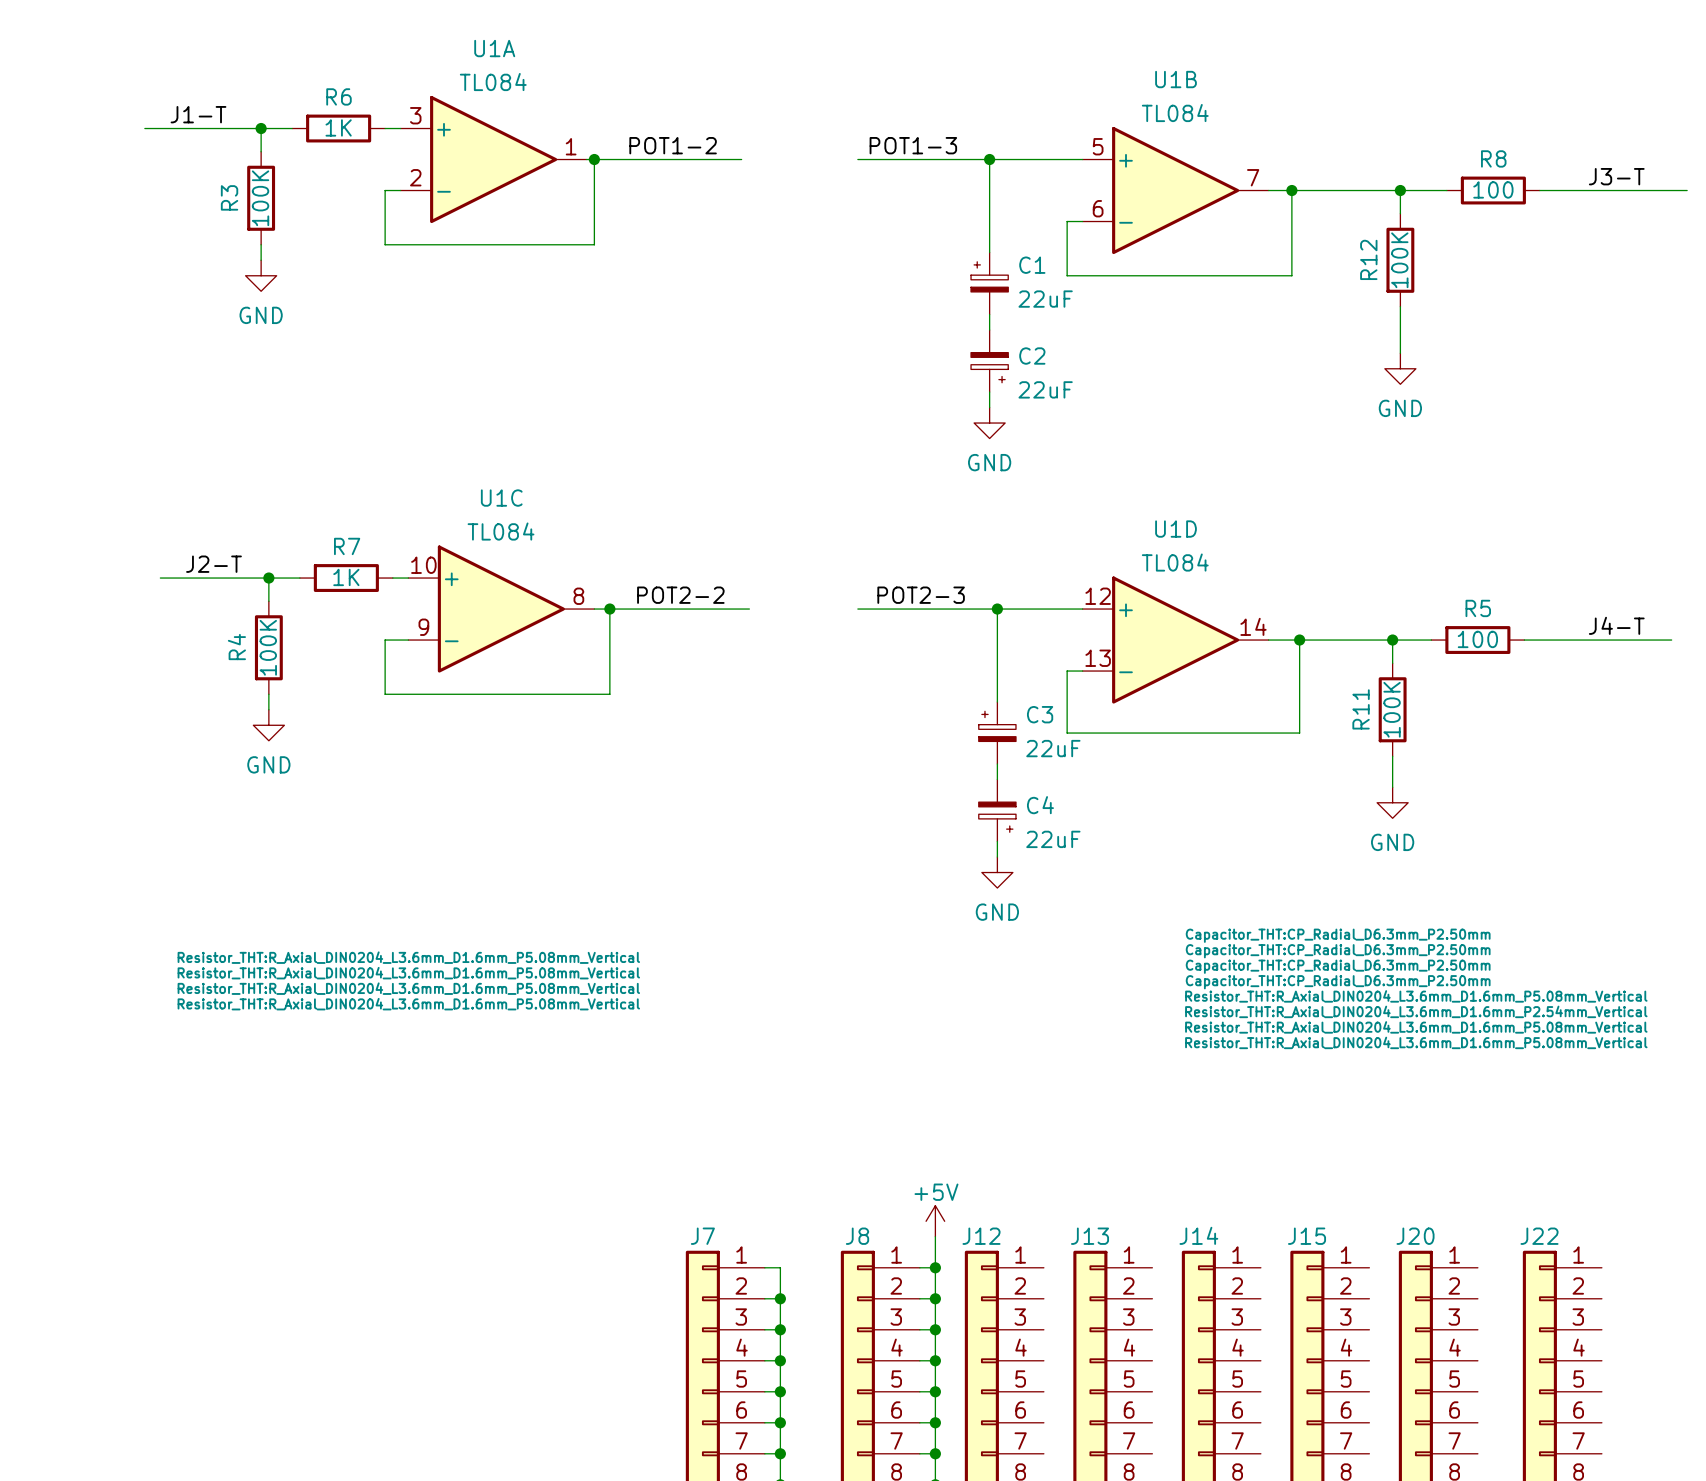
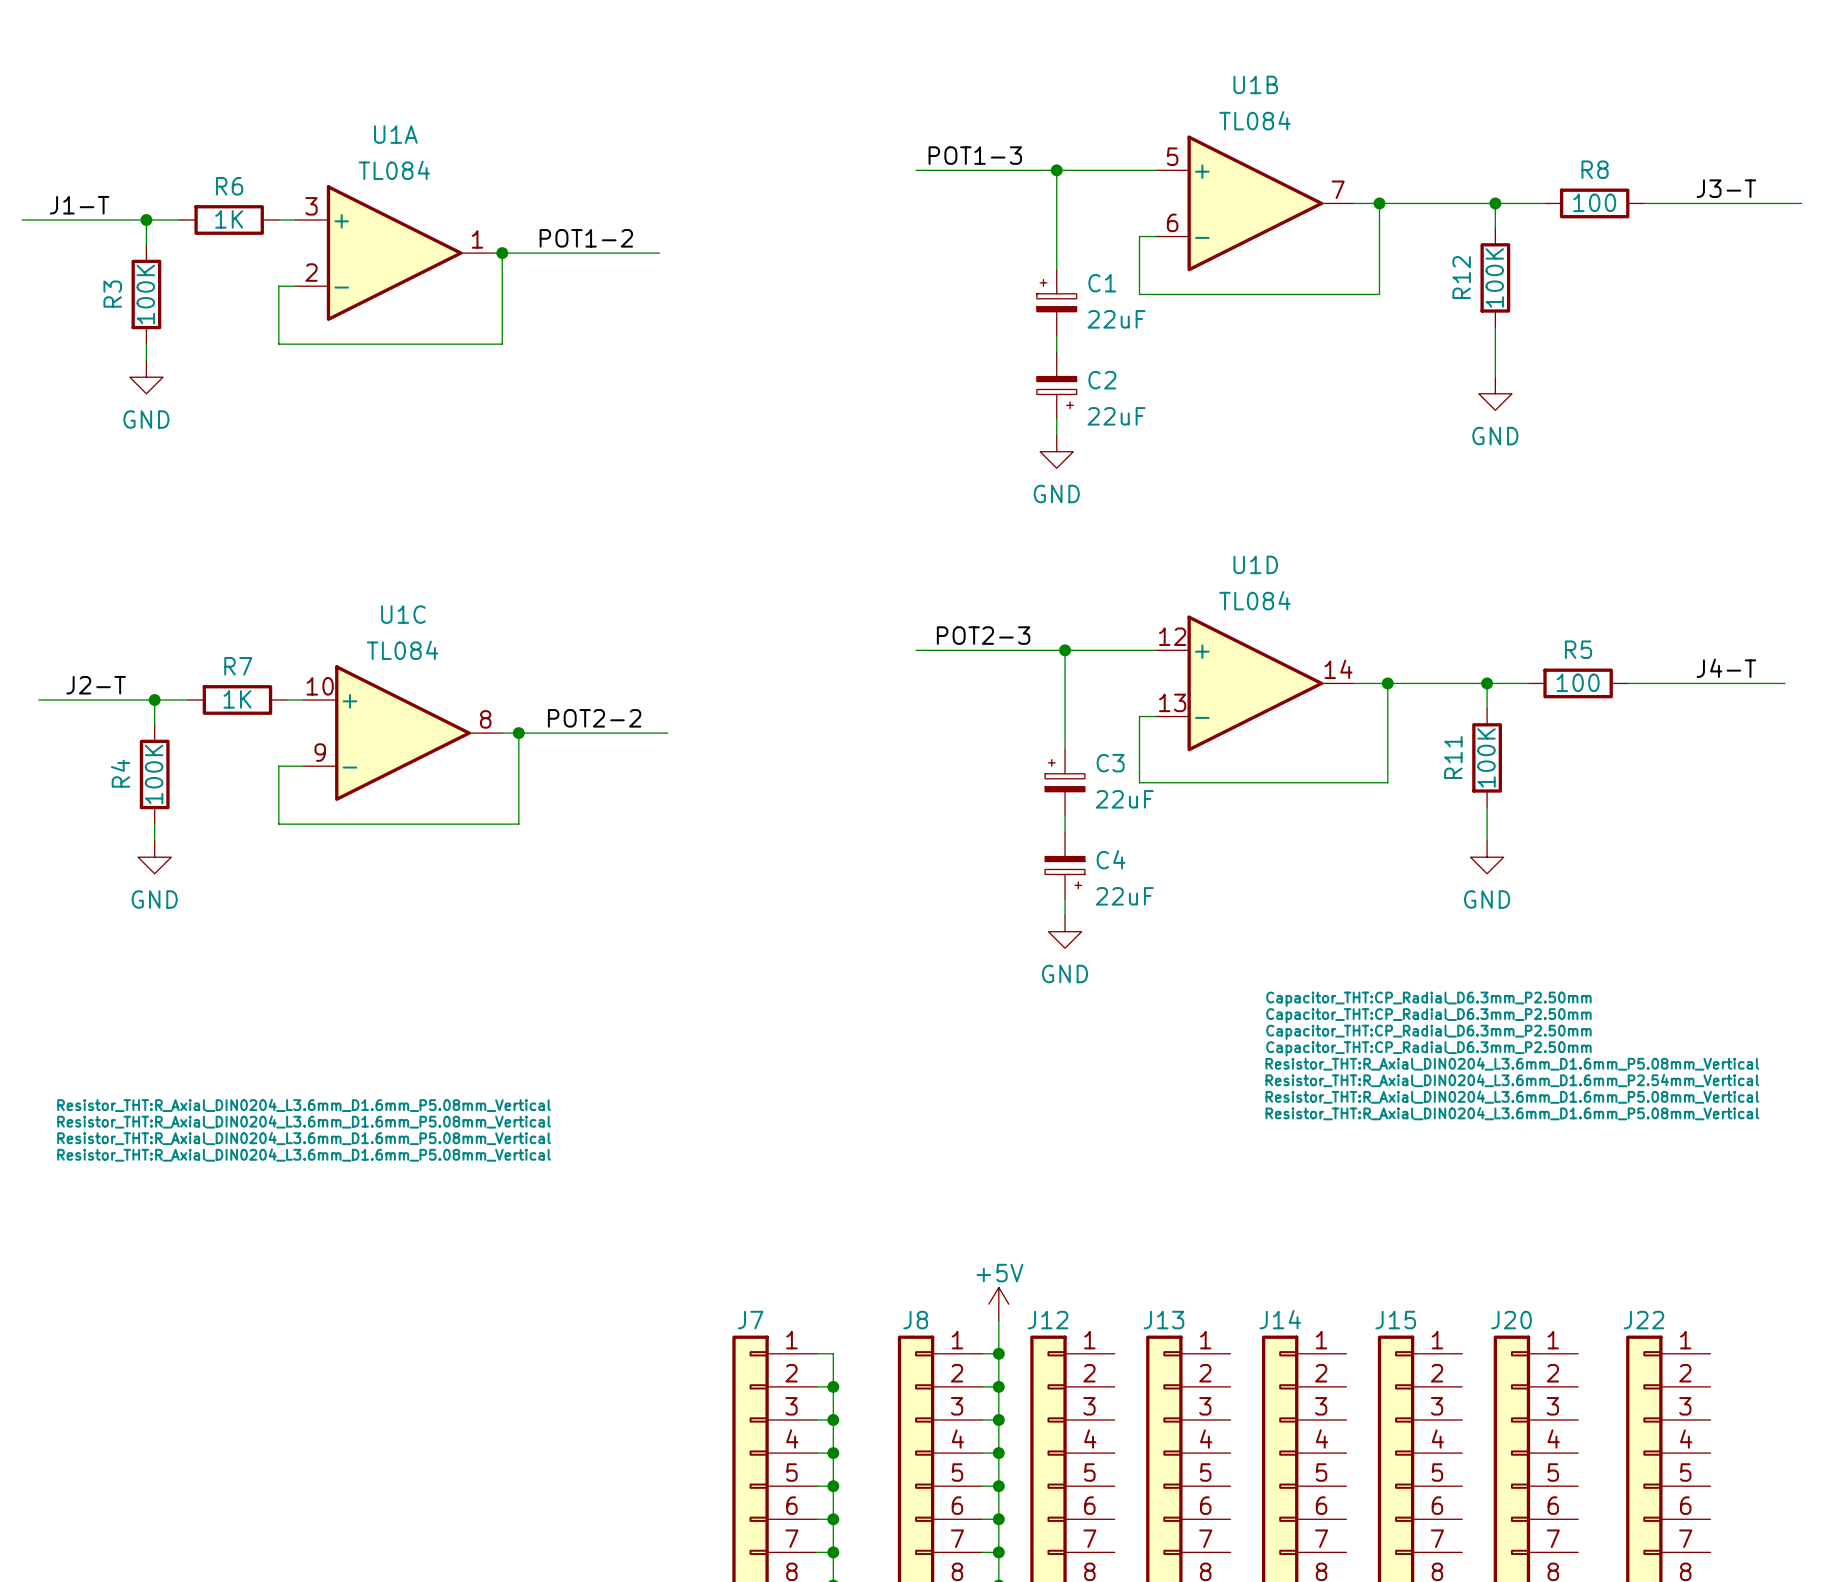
label position: J1-T (198, 114) -> J1-T (79, 205)
wire: (144, 128) (292, 128) -> (22, 219) (179, 219)
wire: (261, 128) (261, 151) -> (146, 219) (146, 244)
junction: (261, 128) -> none
R6 position: (338, 128) -> (229, 219)
wire: (385, 128) (400, 128) -> (278, 219) (295, 219)
label position: POT1-2 (673, 145) -> POT1-2 (586, 238)
U1A position: (493, 159) -> (394, 253)
wire: (586, 159) (741, 159) -> (494, 253) (659, 253)
wire: (594, 159) (594, 244) (385, 244) (385, 190) (400, 190) -> (502, 253) (502, 344) (278, 344) (278, 286) (295, 286)
junction: (594, 159) -> none
R3 position: (261, 198) -> (146, 294)
junction: none -> (146, 219)
junction: none -> (502, 253)
wire: (261, 244) (261, 260) -> (146, 344) (146, 360)
power symbol position: GND (261, 275) -> GND (146, 377)
label position: J2-T (214, 564) -> J2-T (96, 685)
wire: (160, 578) (299, 578) -> (38, 699) (187, 699)
wire: (268, 578) (268, 601) -> (154, 699) (154, 724)
junction: (268, 578) -> none
R7 position: (346, 578) -> (237, 699)
wire: (392, 578) (408, 578) -> (287, 699) (303, 699)
label position: POT2-2 (680, 595) -> POT2-2 (594, 718)
U1C position: (501, 609) -> (402, 733)
wire: (594, 609) (749, 609) -> (502, 733) (667, 733)
wire: (609, 609) (609, 694) (385, 694) (385, 640) (408, 640) -> (518, 733) (518, 824) (278, 824) (278, 766) (303, 766)
junction: (609, 609) -> none
R4 position: (268, 647) -> (154, 774)
junction: none -> (154, 699)
junction: none -> (518, 733)
wire: (268, 694) (268, 709) -> (154, 824) (154, 840)
power symbol position: GND (268, 725) -> GND (154, 857)

